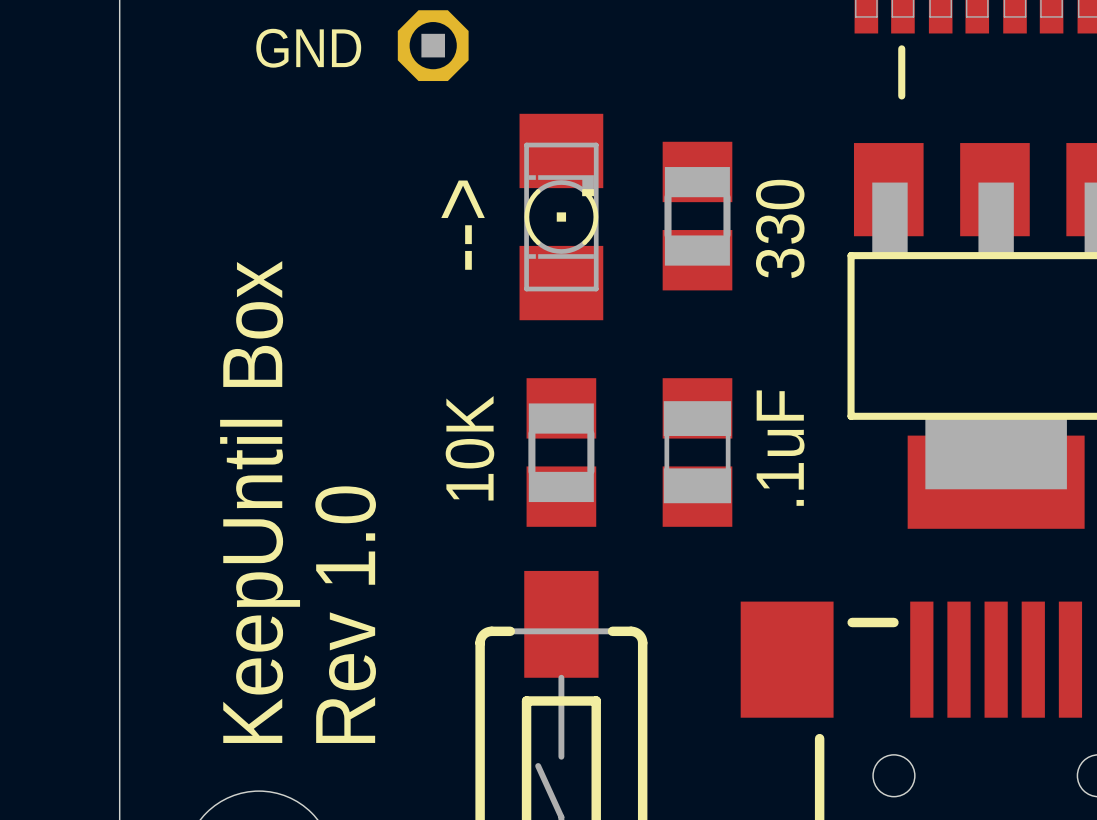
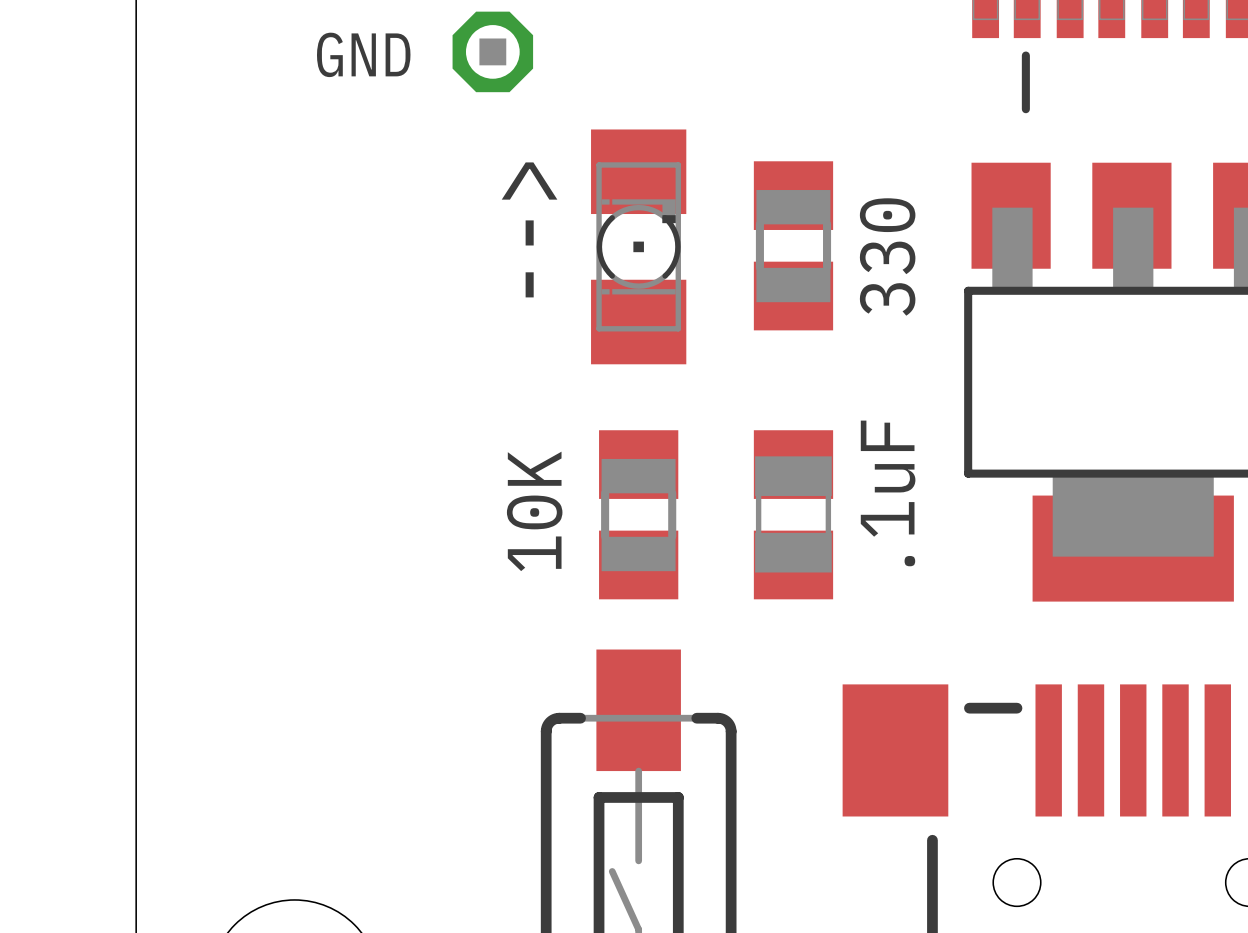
text: KeepUntil Box (260, 502) -> none
text: Rev 1.0 (345, 614) -> none

